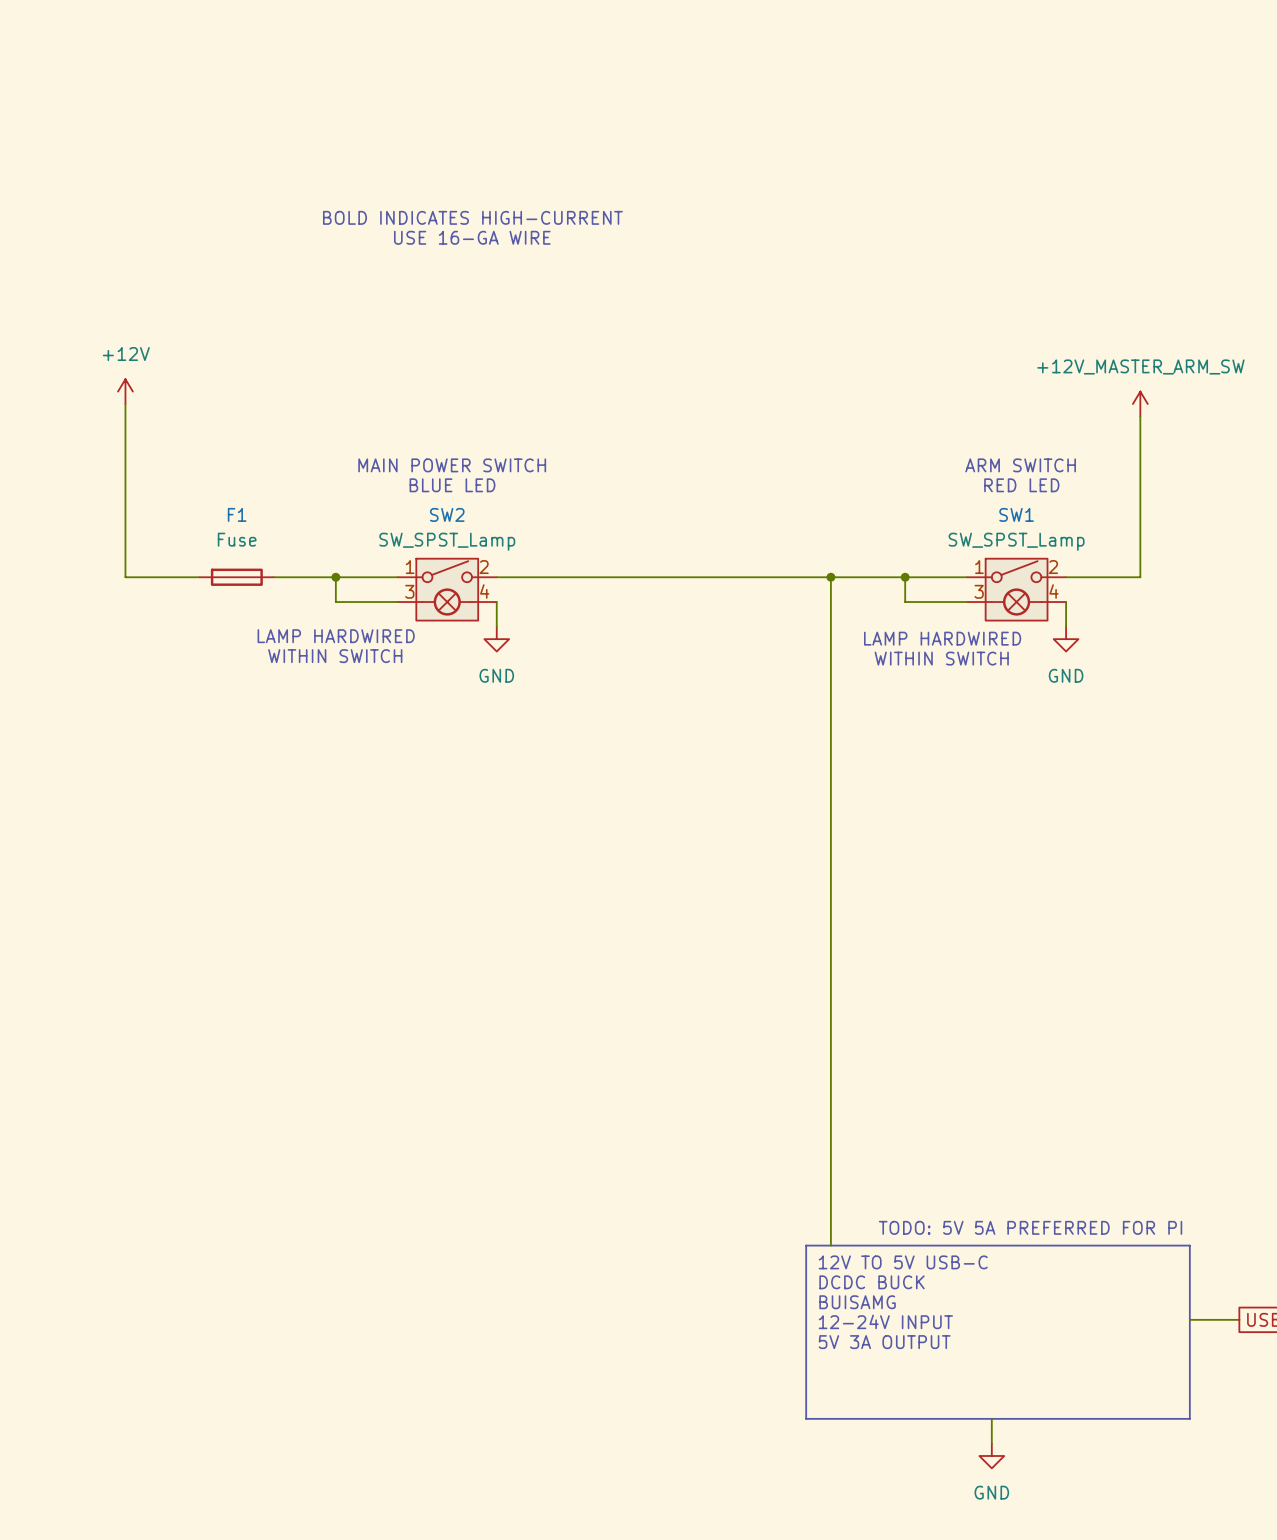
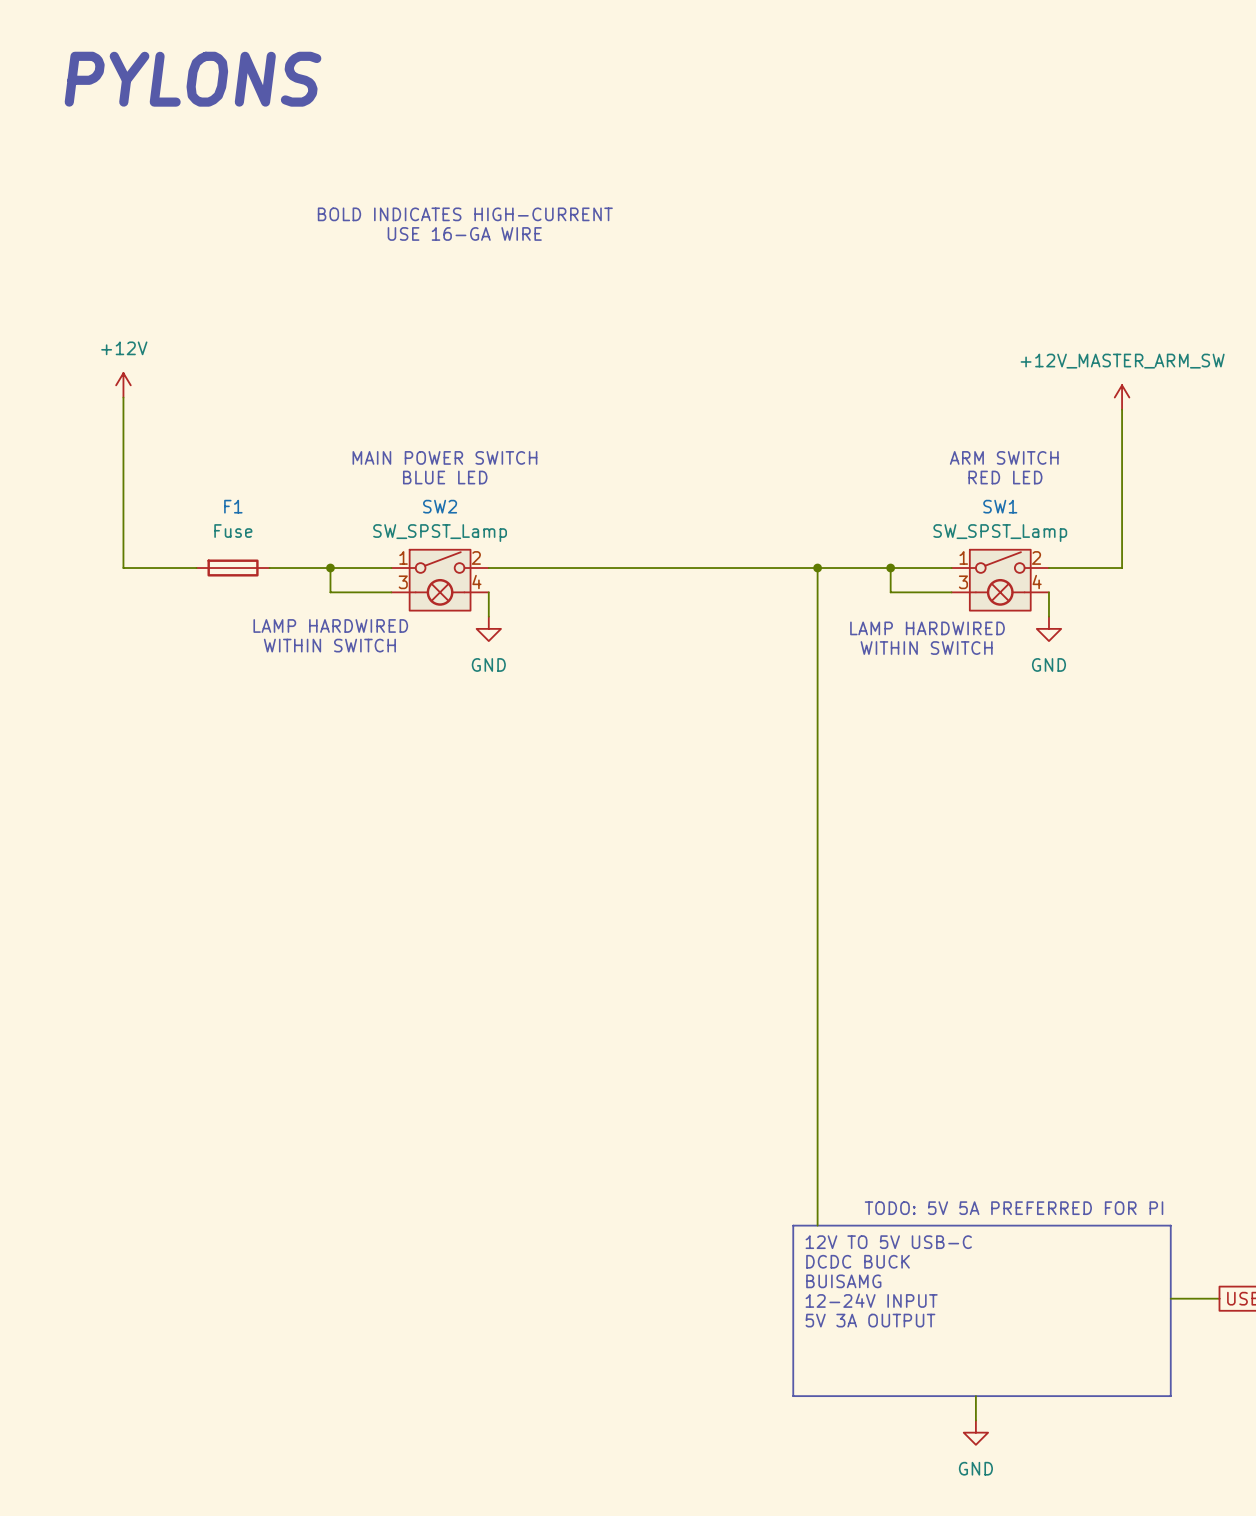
text: none -> PYLONS (193, 79)

